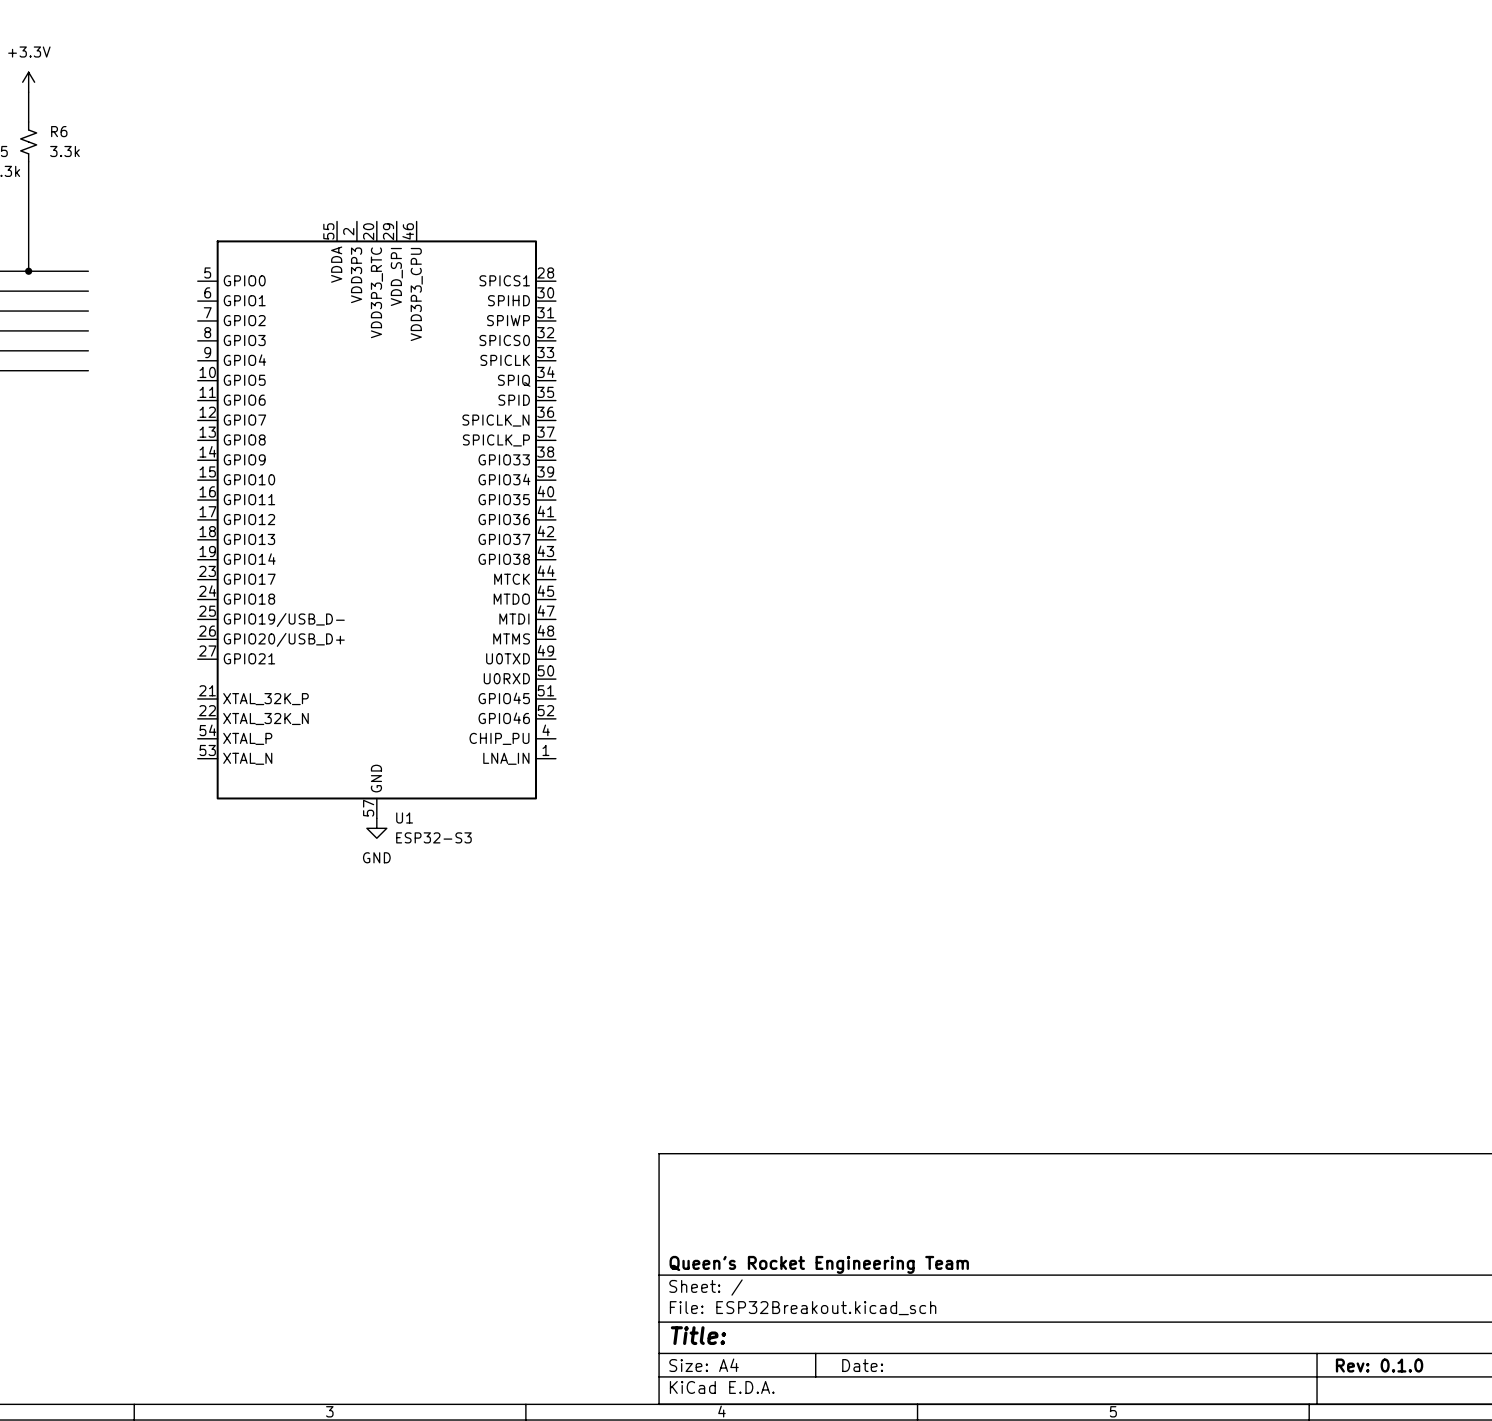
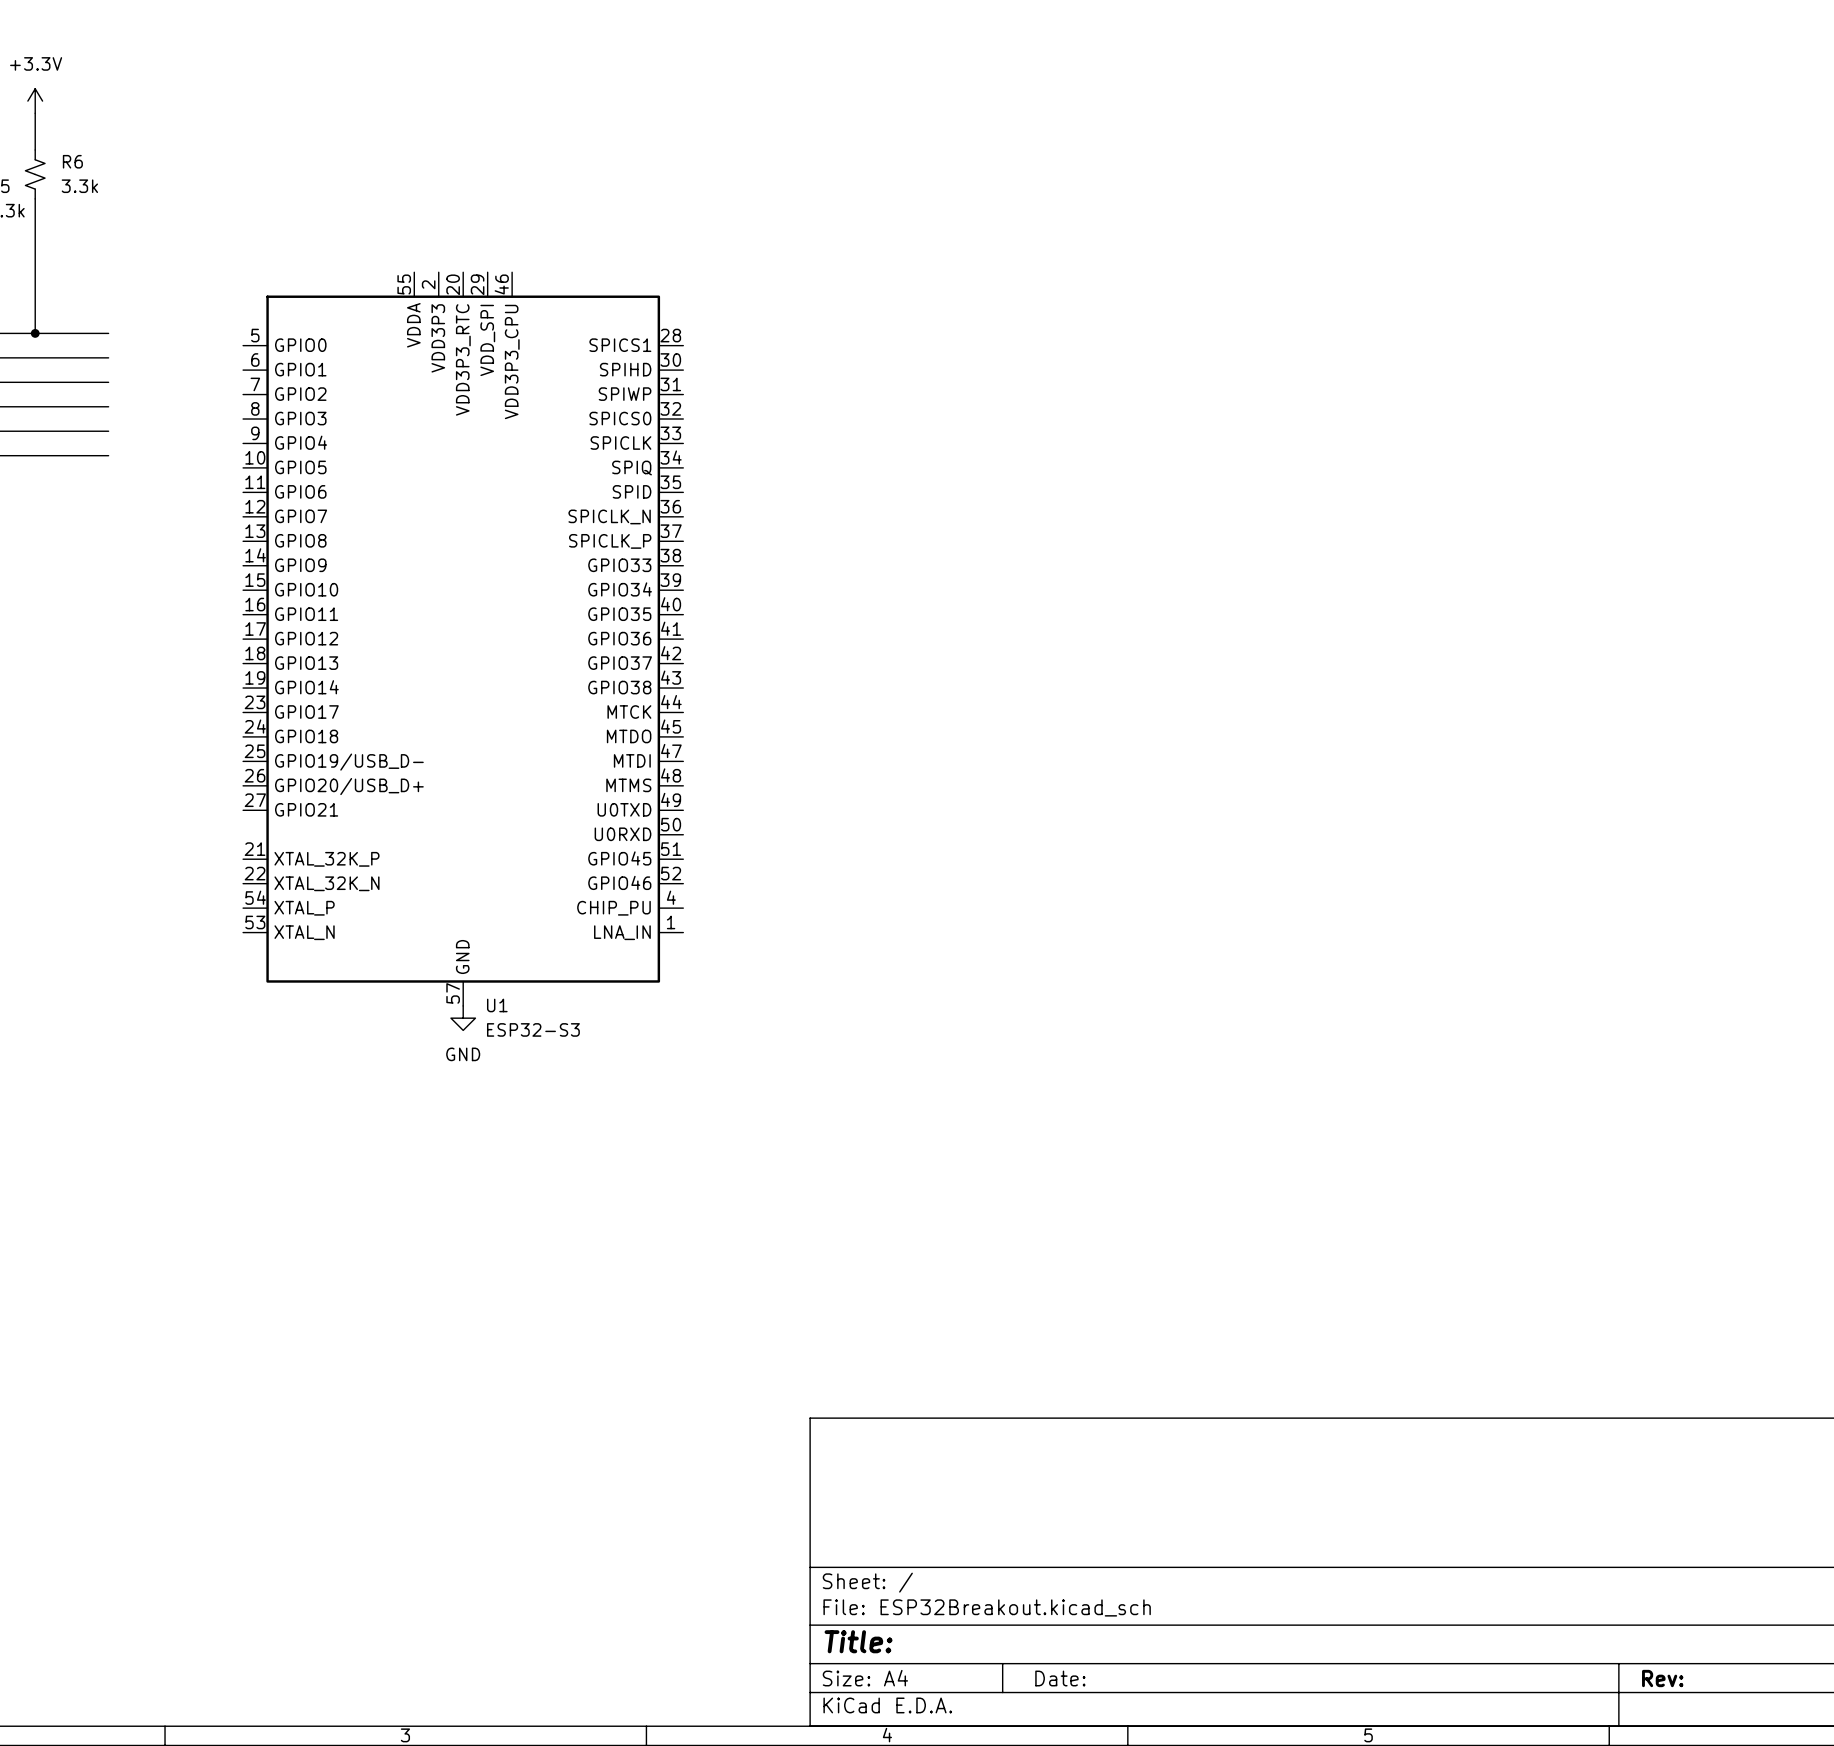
title block: Queen's Rocket Engineering Team (819, 1264) -> none
title block: Rev: 0.1.0 (1379, 1365) -> Rev: (1662, 1678)

